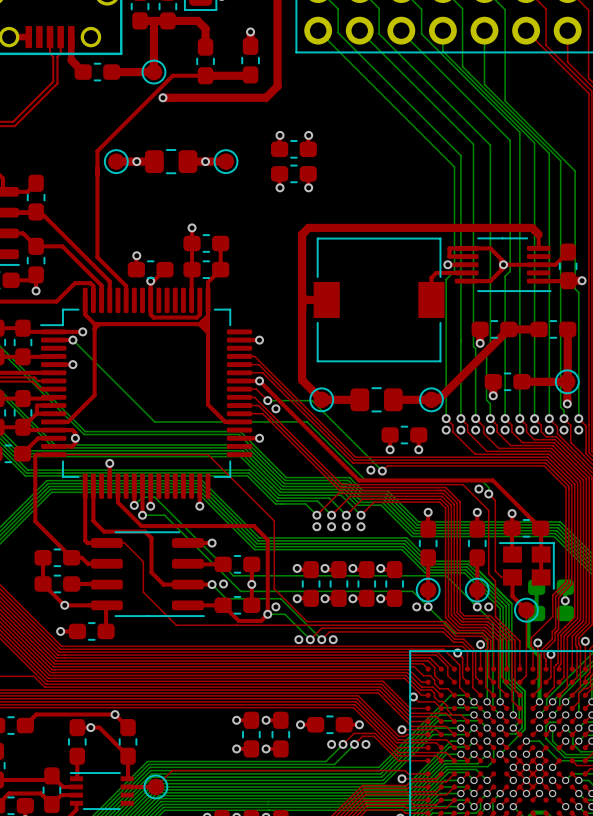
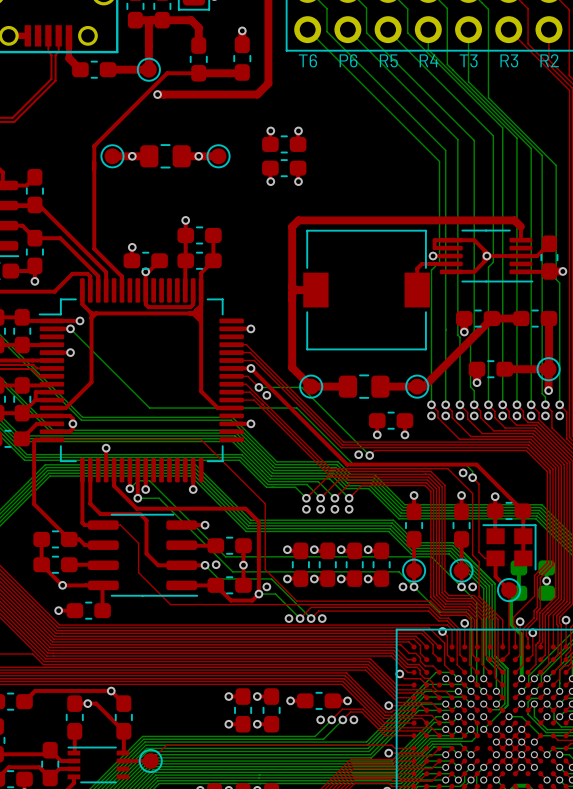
text: none -> T6 (307, 60)
text: none -> P6 (348, 60)
text: none -> R5 (388, 60)
text: none -> R4 (428, 60)
text: none -> T3 (468, 60)
text: none -> R3 (509, 60)
text: none -> R2 (549, 60)

